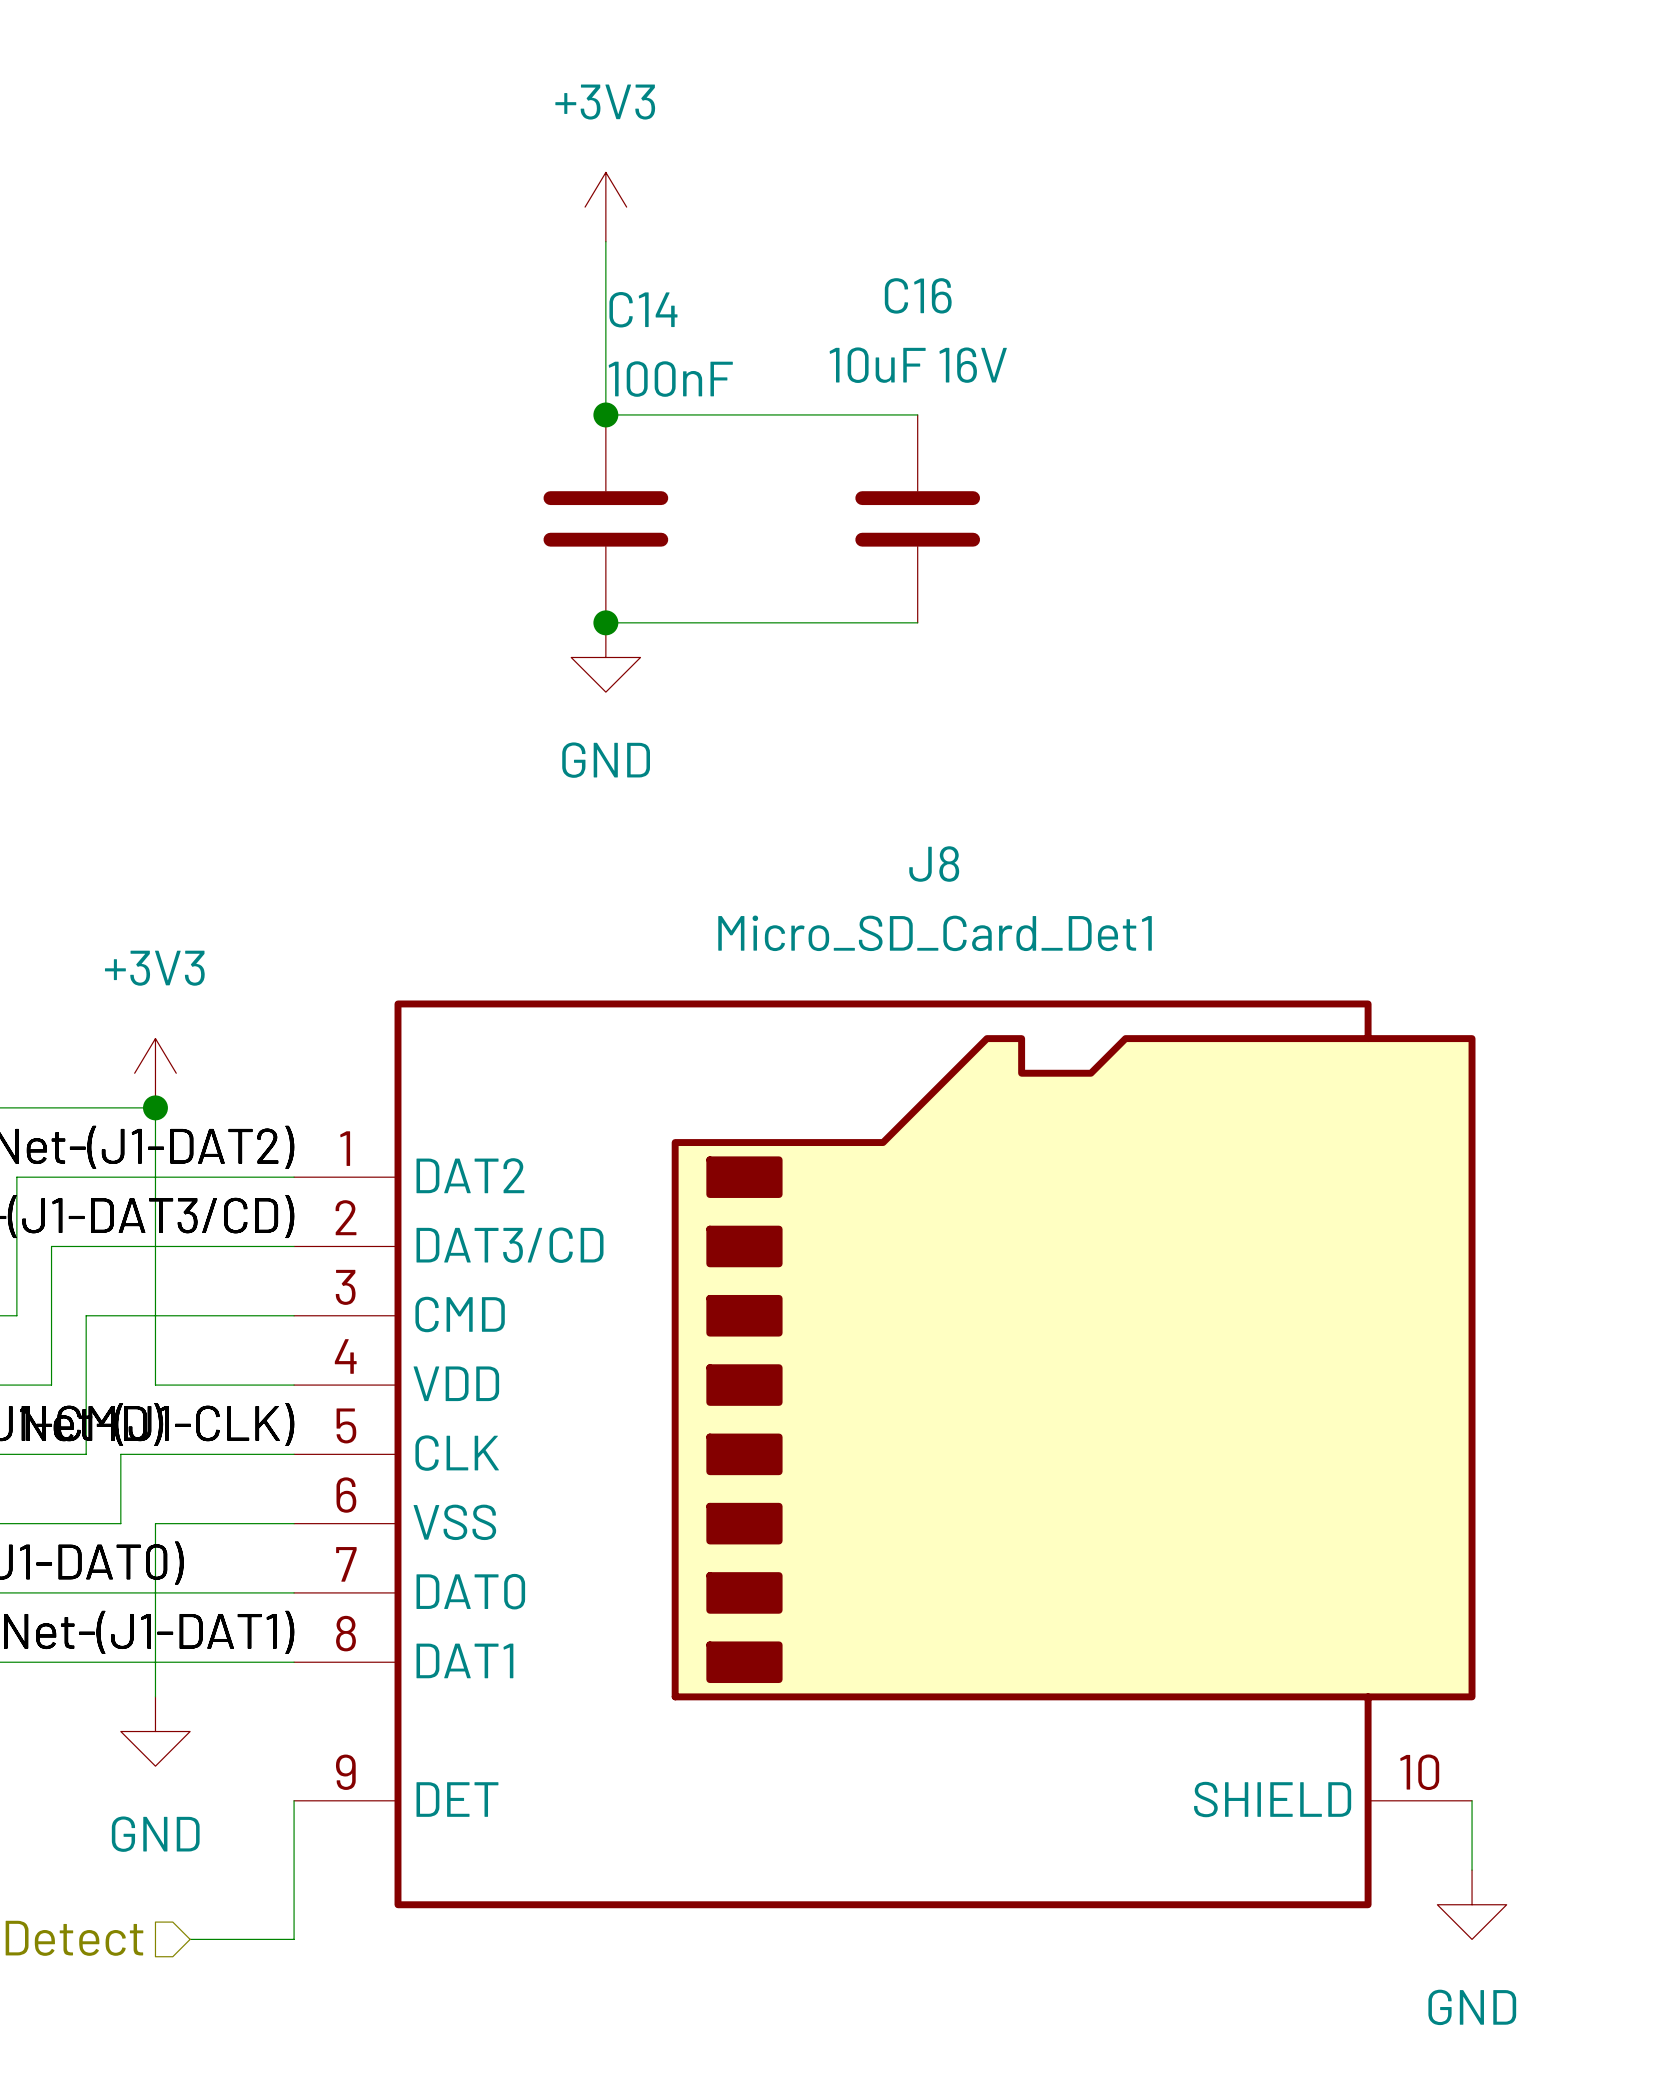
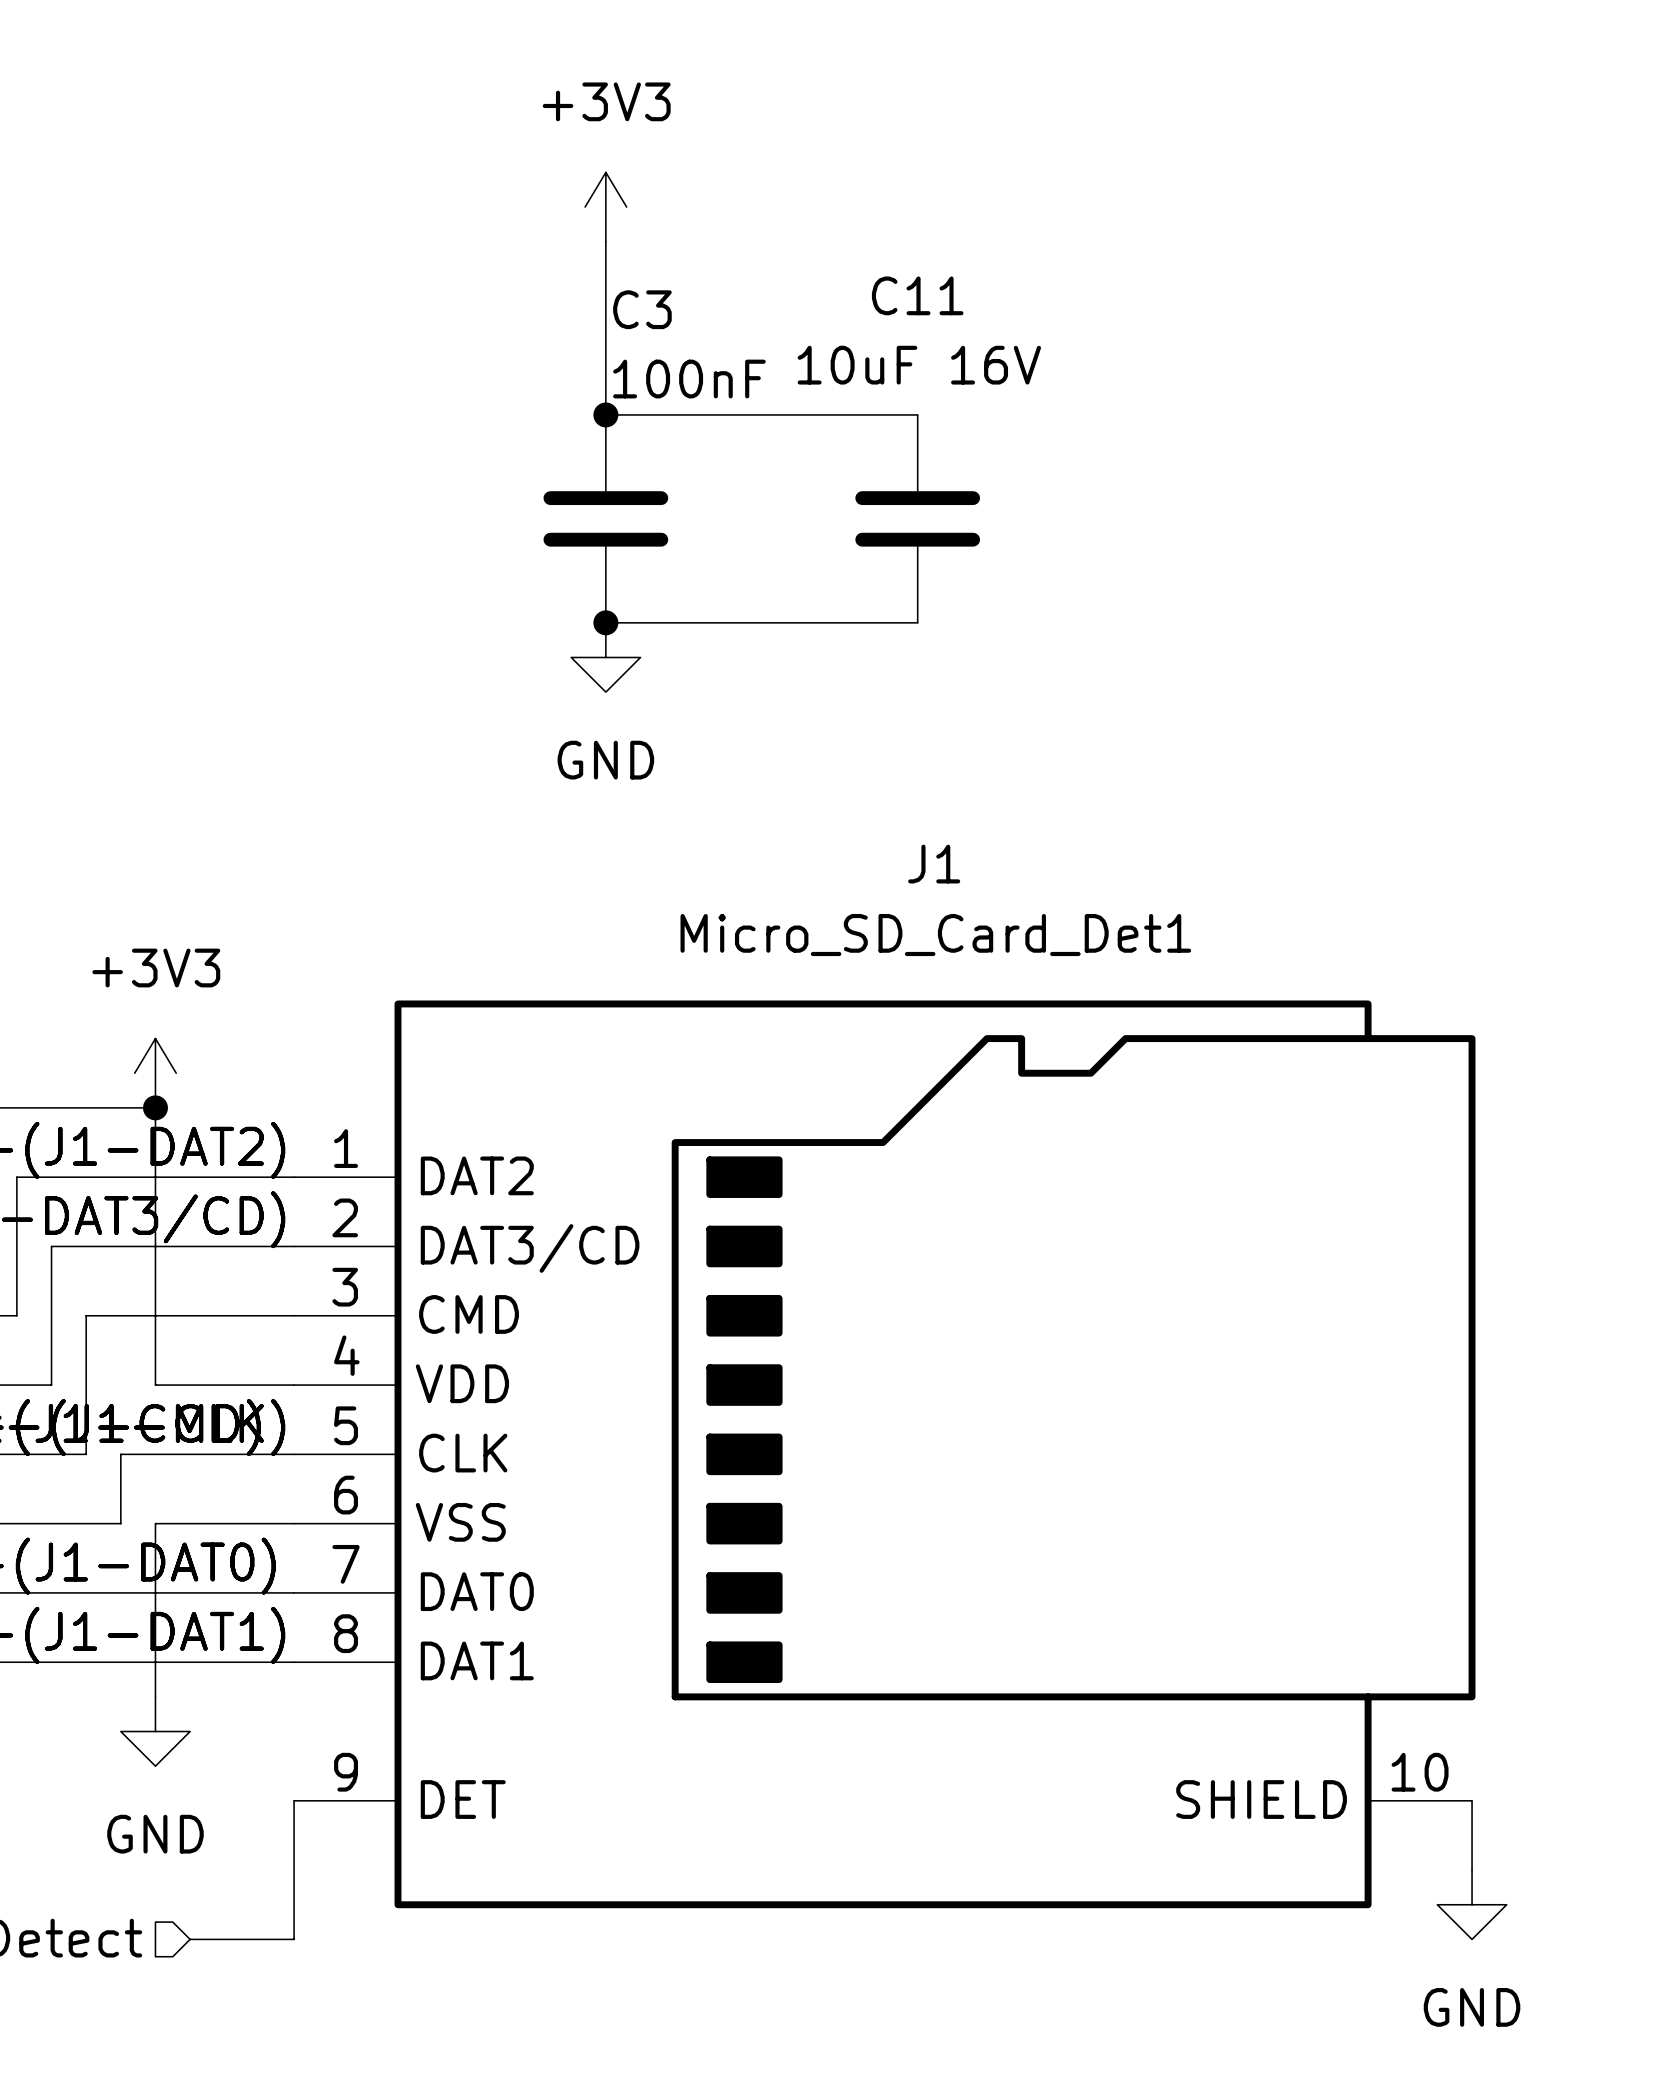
C16 name: C16 (918, 295) -> C11 (917, 295)
C14 name: C14 (643, 309) -> C3 (642, 309)
J8 name: J8 (934, 864) -> J1 (934, 864)

